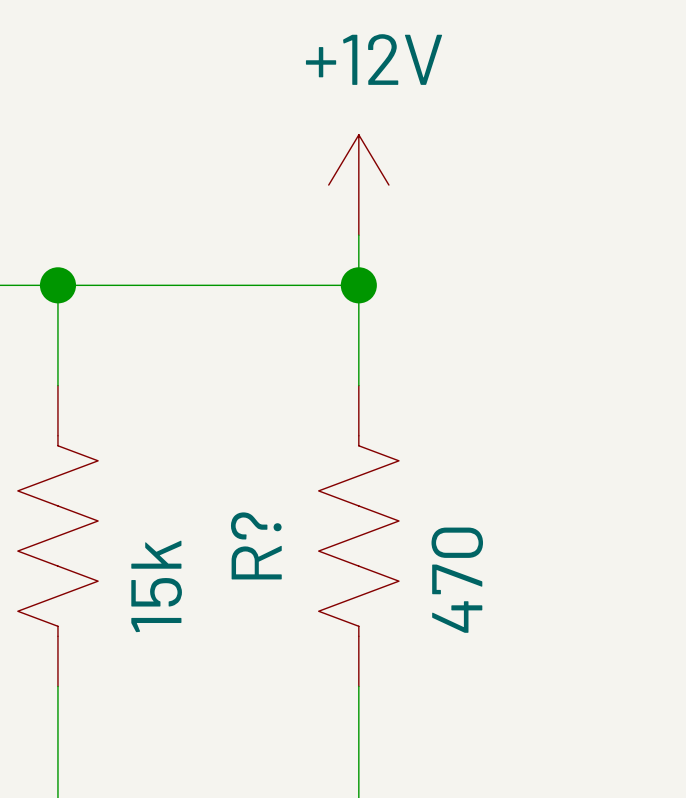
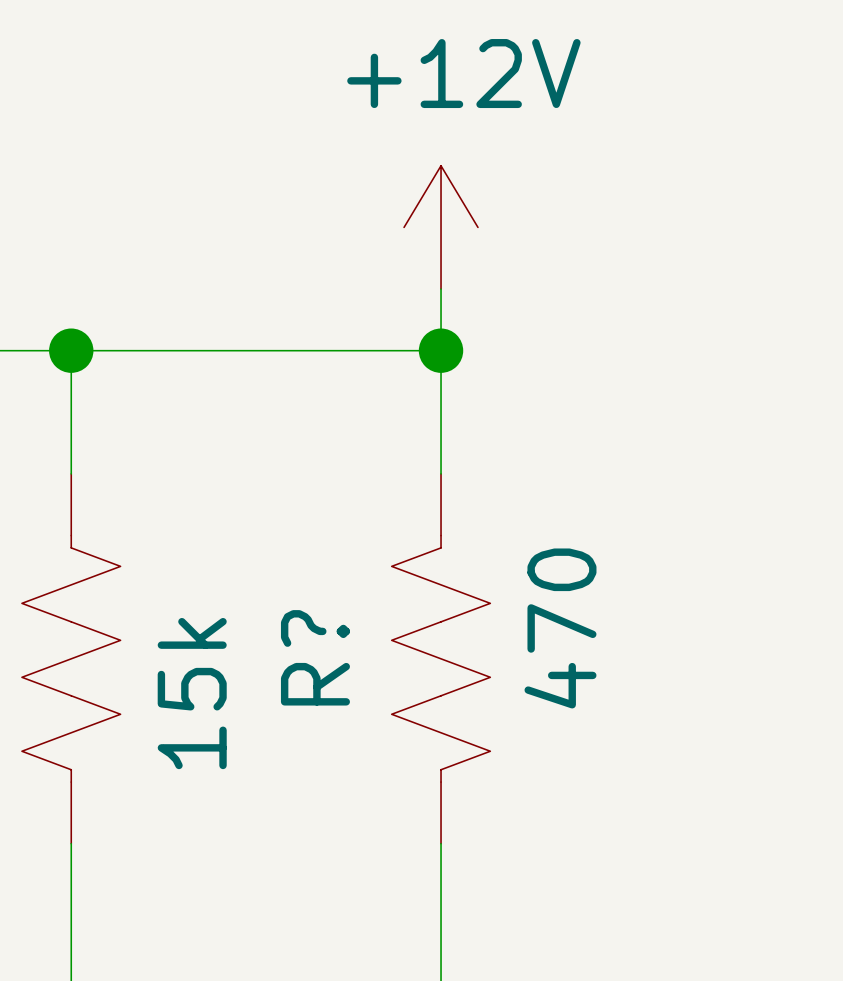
R? flip: as is (358, 536) -> left-right (441, 658)

